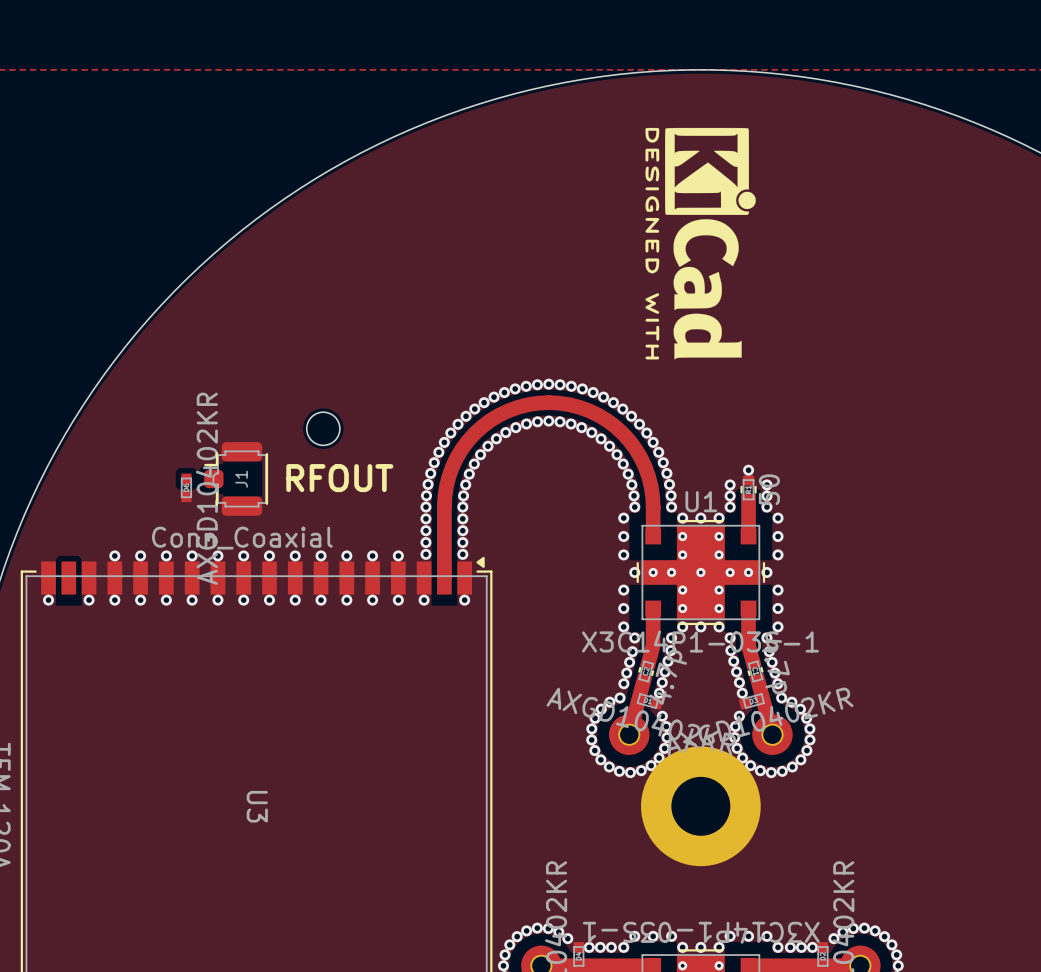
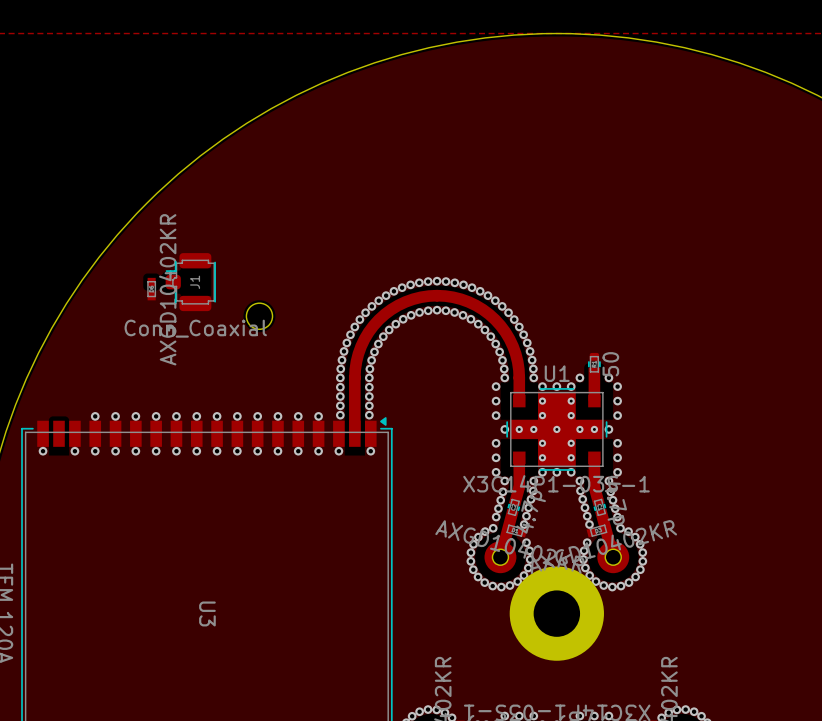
drawing: [645, 127, 756, 360] -> none
via: (748, 470) -> none
J1 position: (236, 478) -> (190, 282)
text: RFOUT (339, 478) -> none
via: (730, 484) -> none
via: (766, 484) -> none
part position: (186, 487) -> (151, 289)
via: (730, 496) -> none
via: (766, 496) -> none

